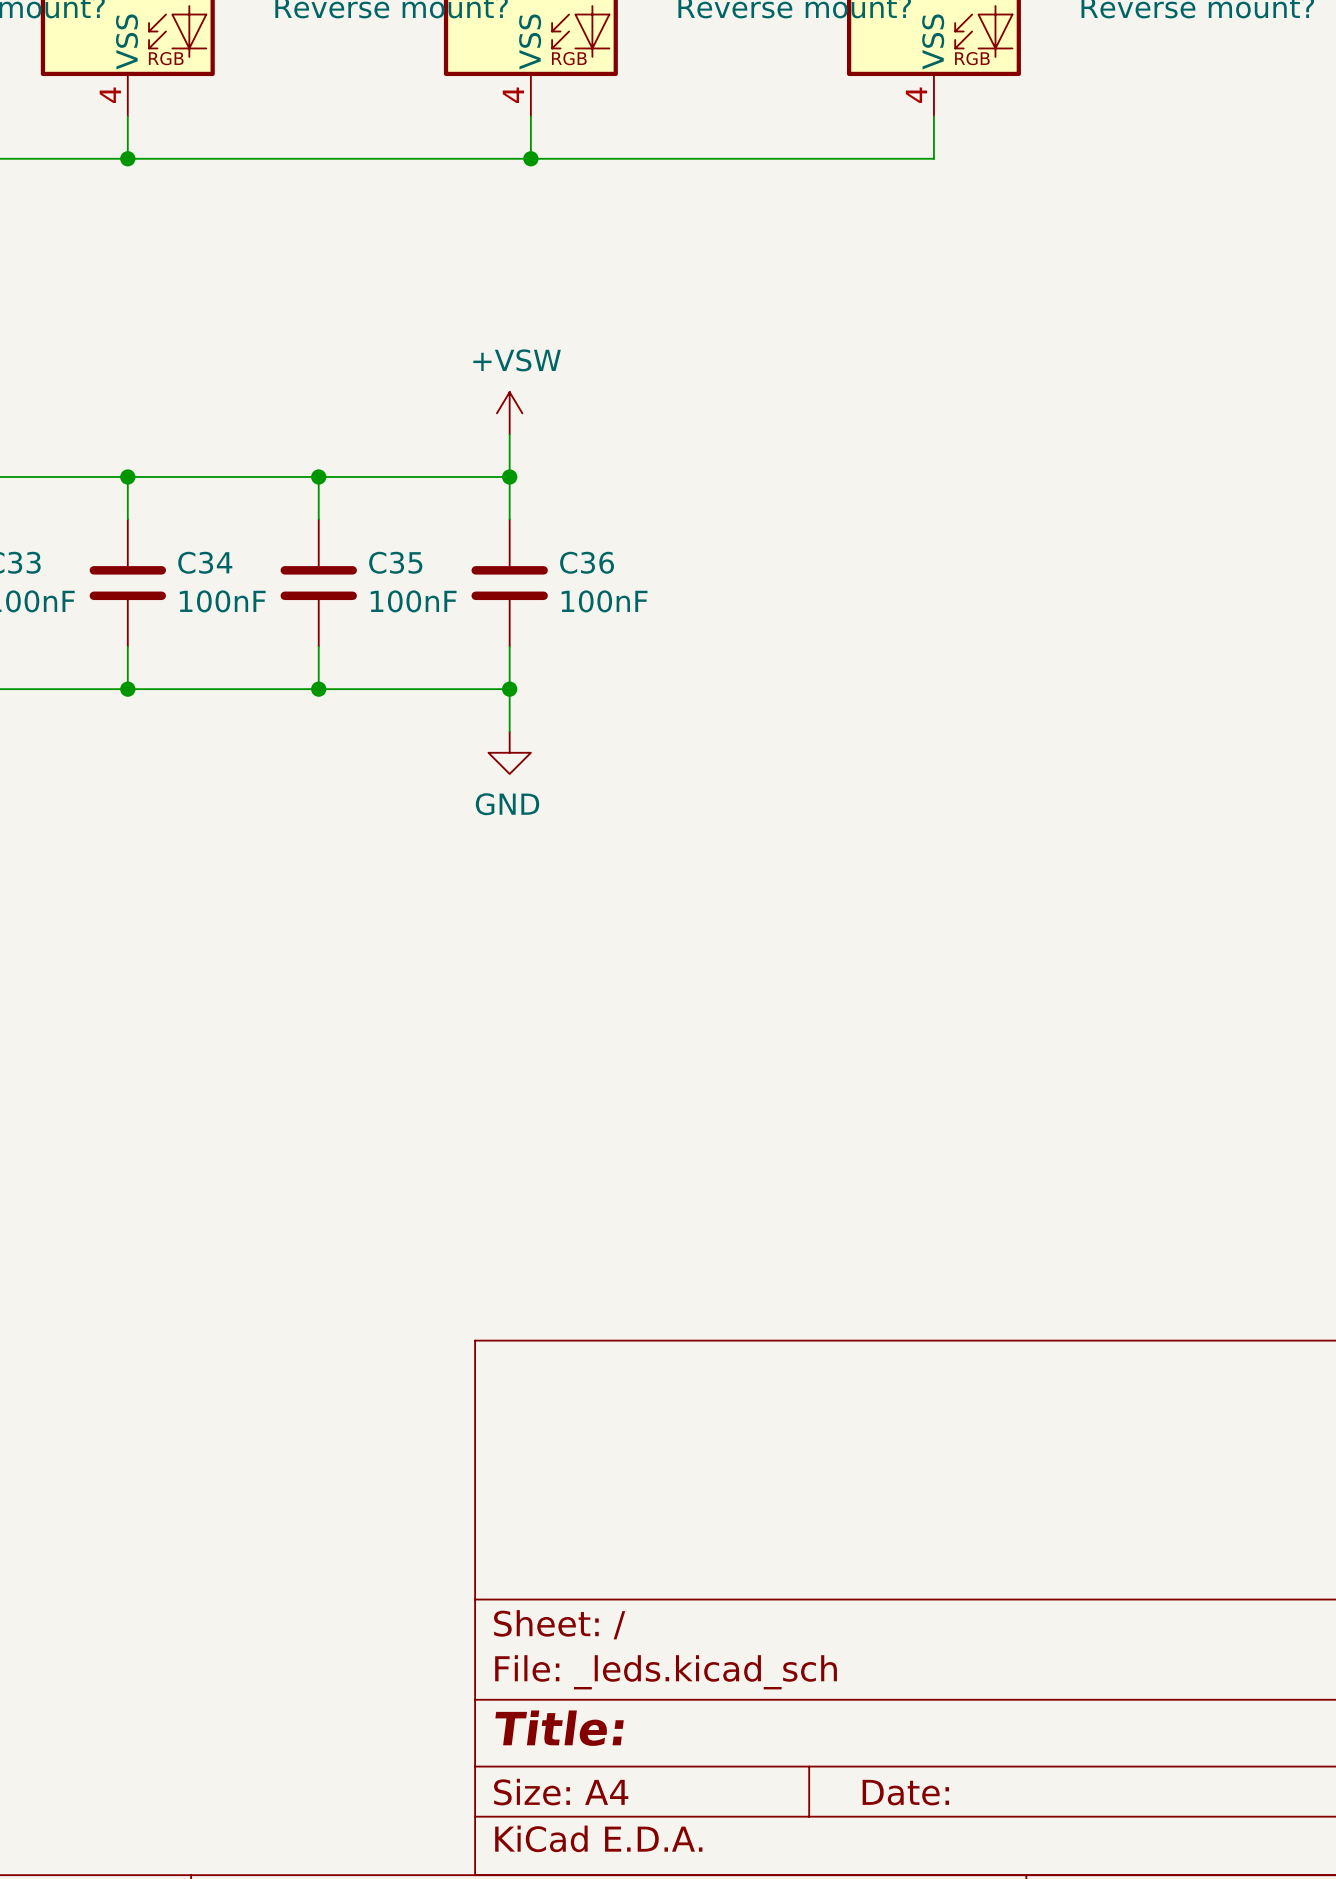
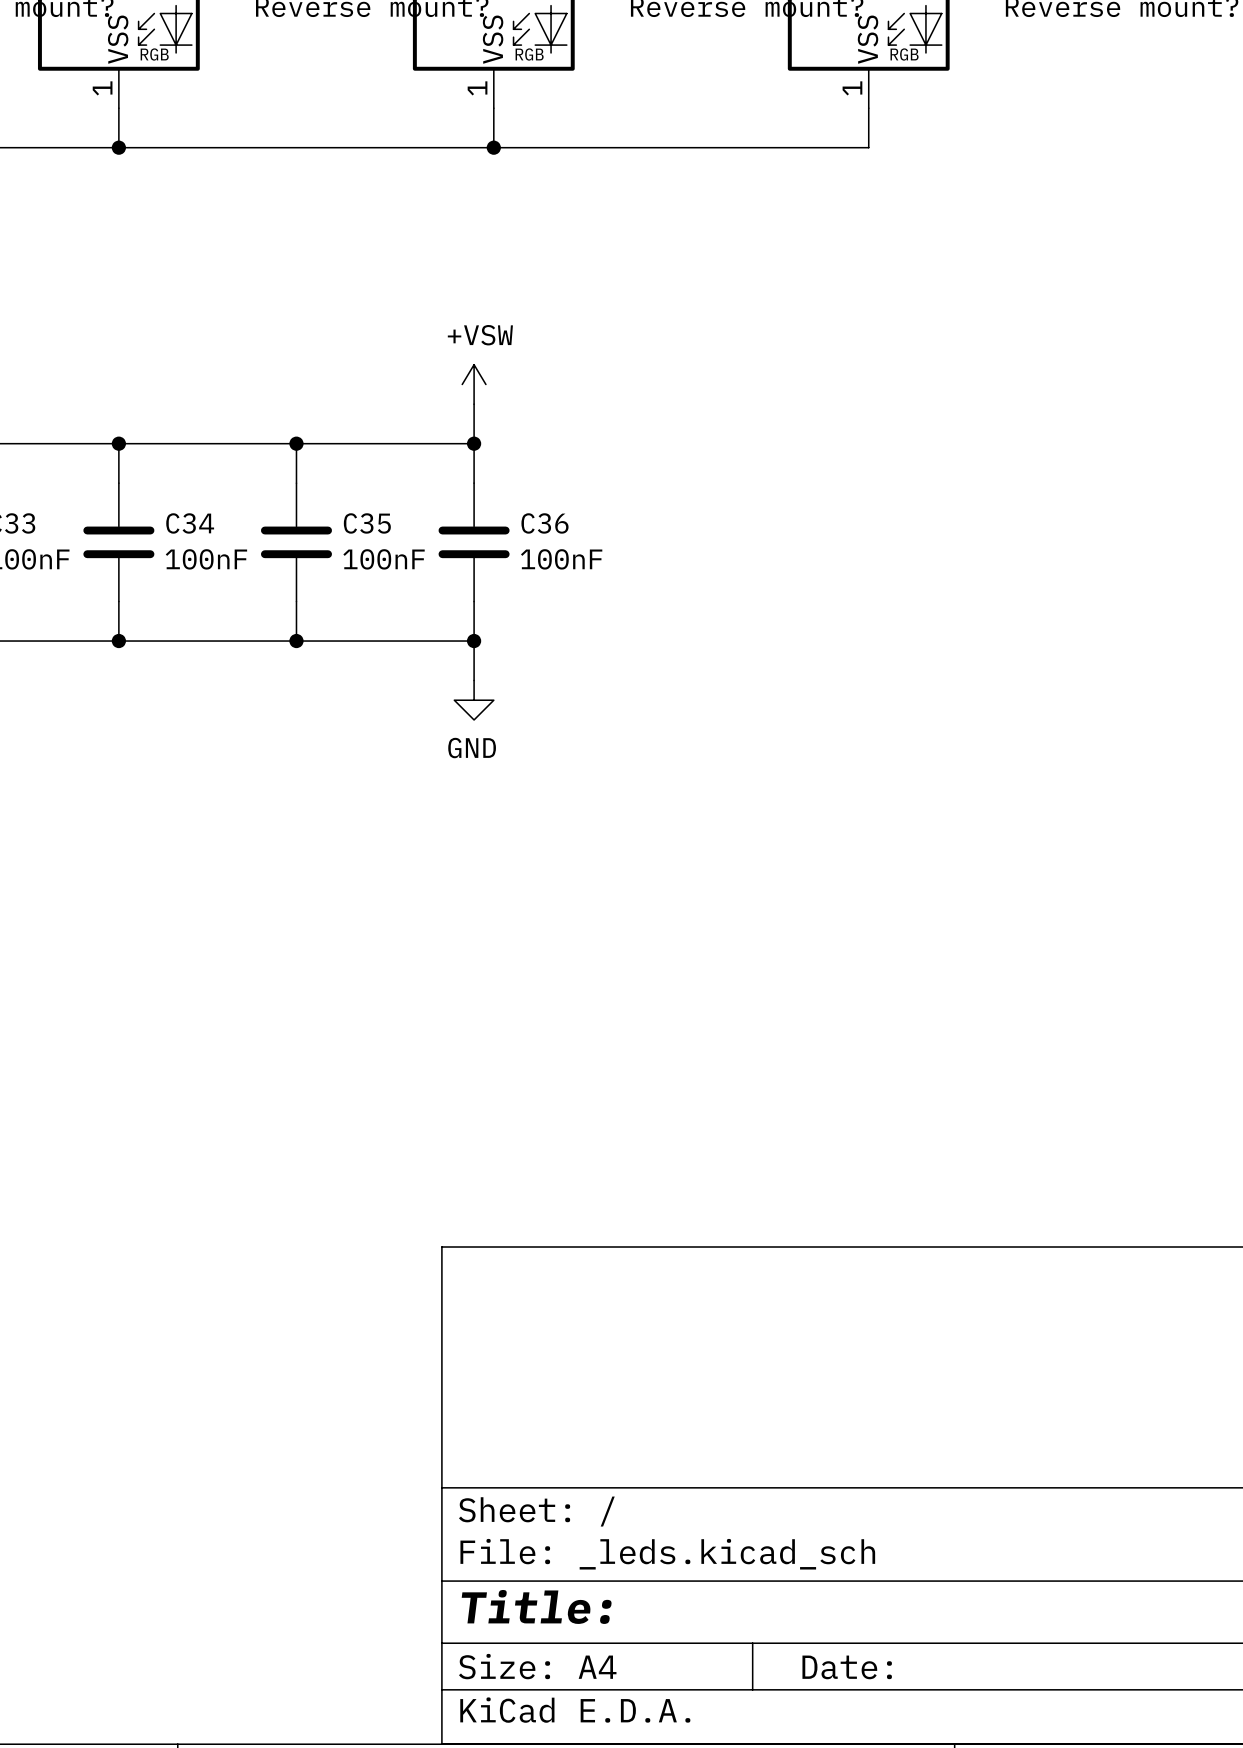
part pin number: 4 (110, 95) -> 1 (102, 88)
part pin number: 4 (513, 95) -> 1 (477, 88)
part pin number: 4 (916, 95) -> 1 (852, 88)

